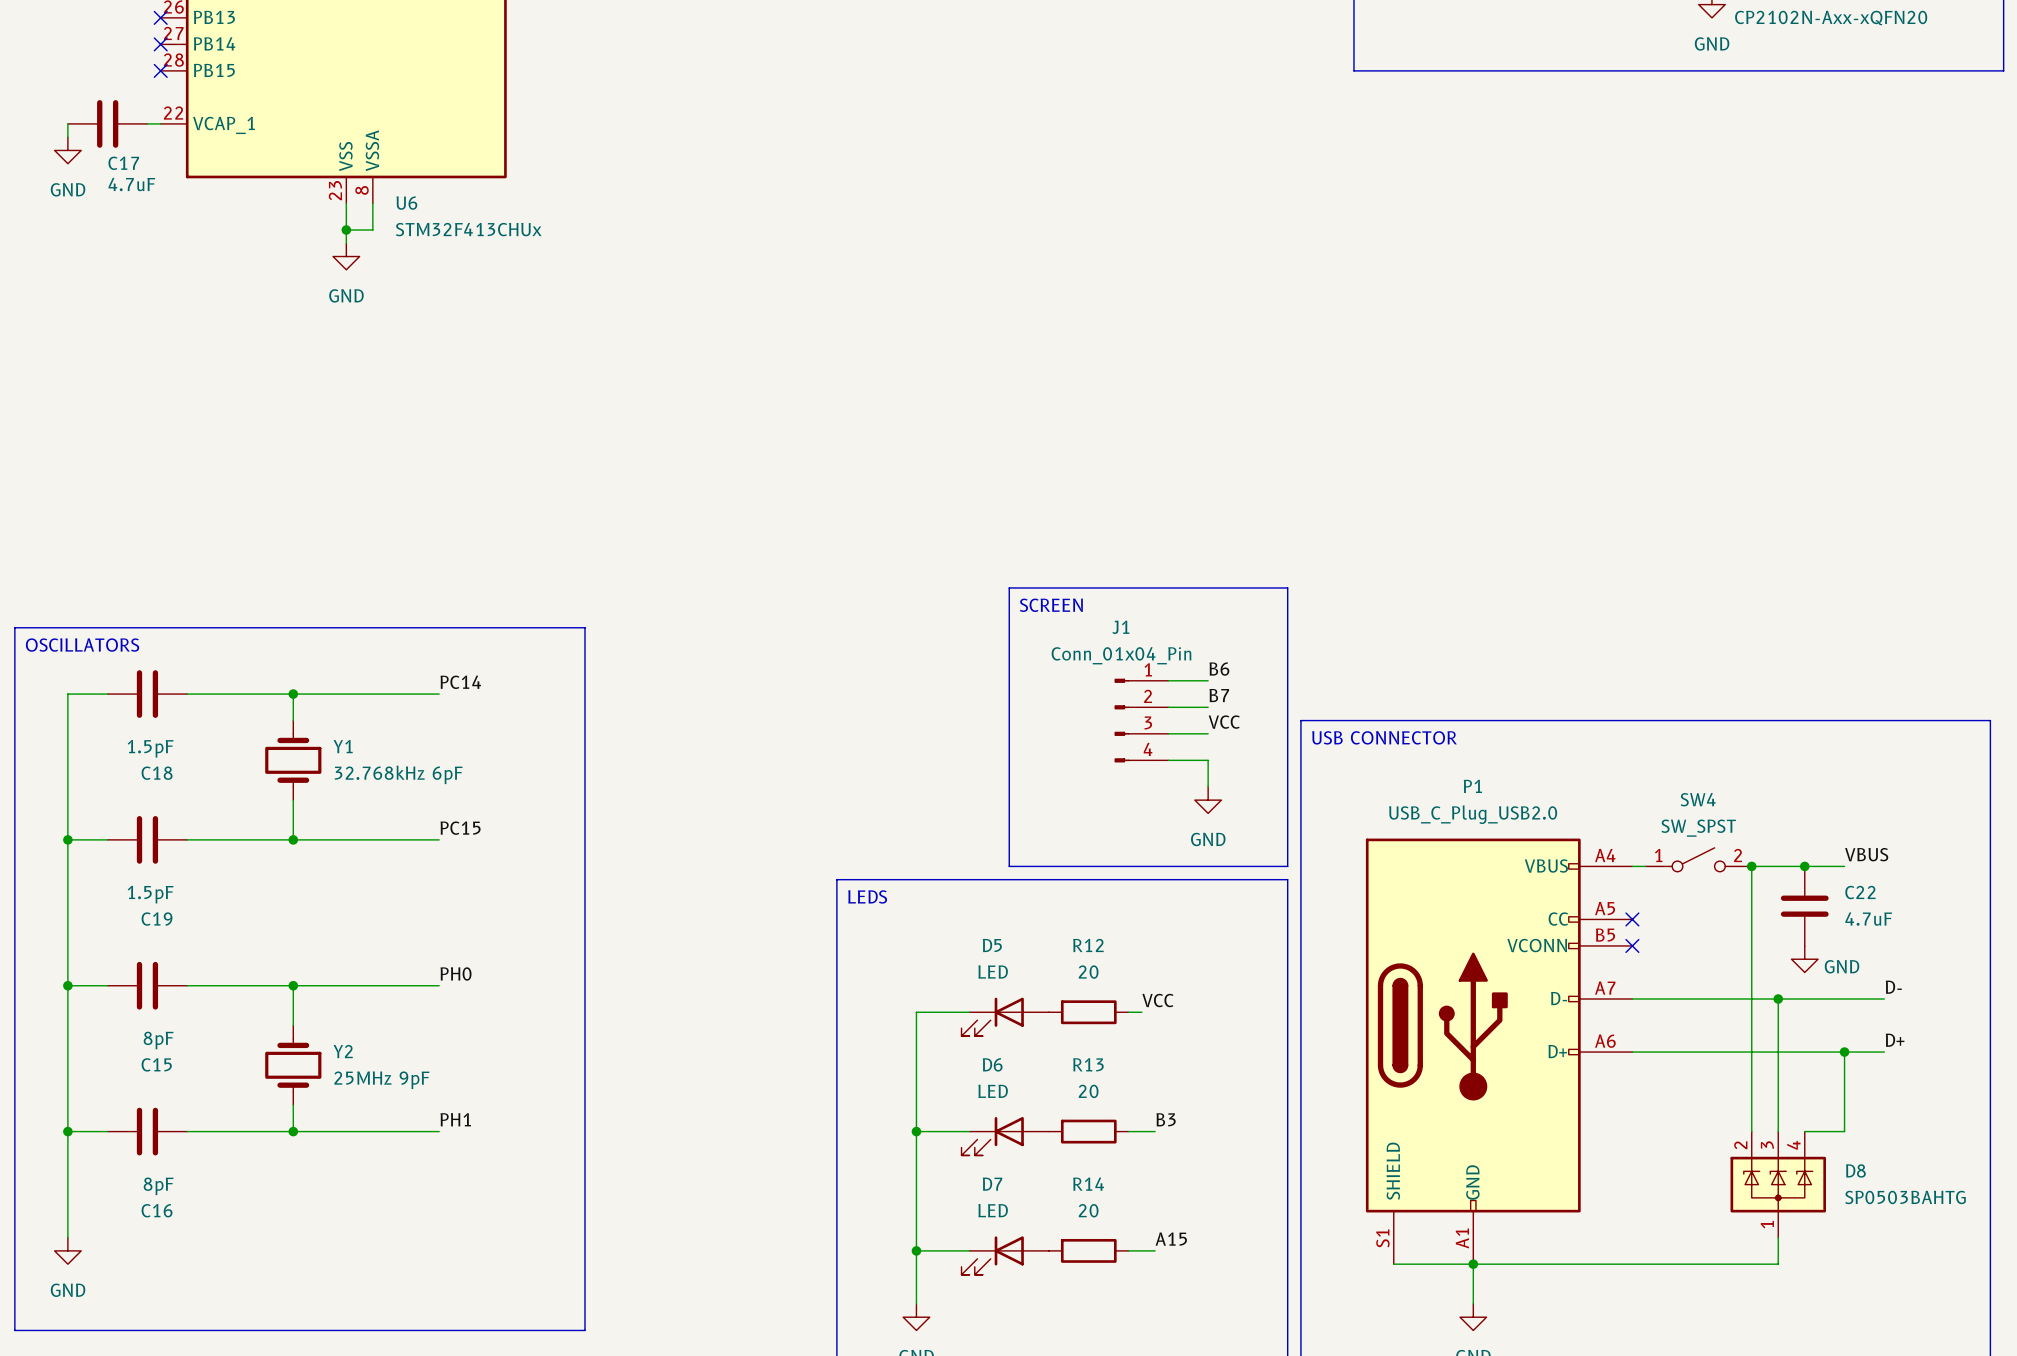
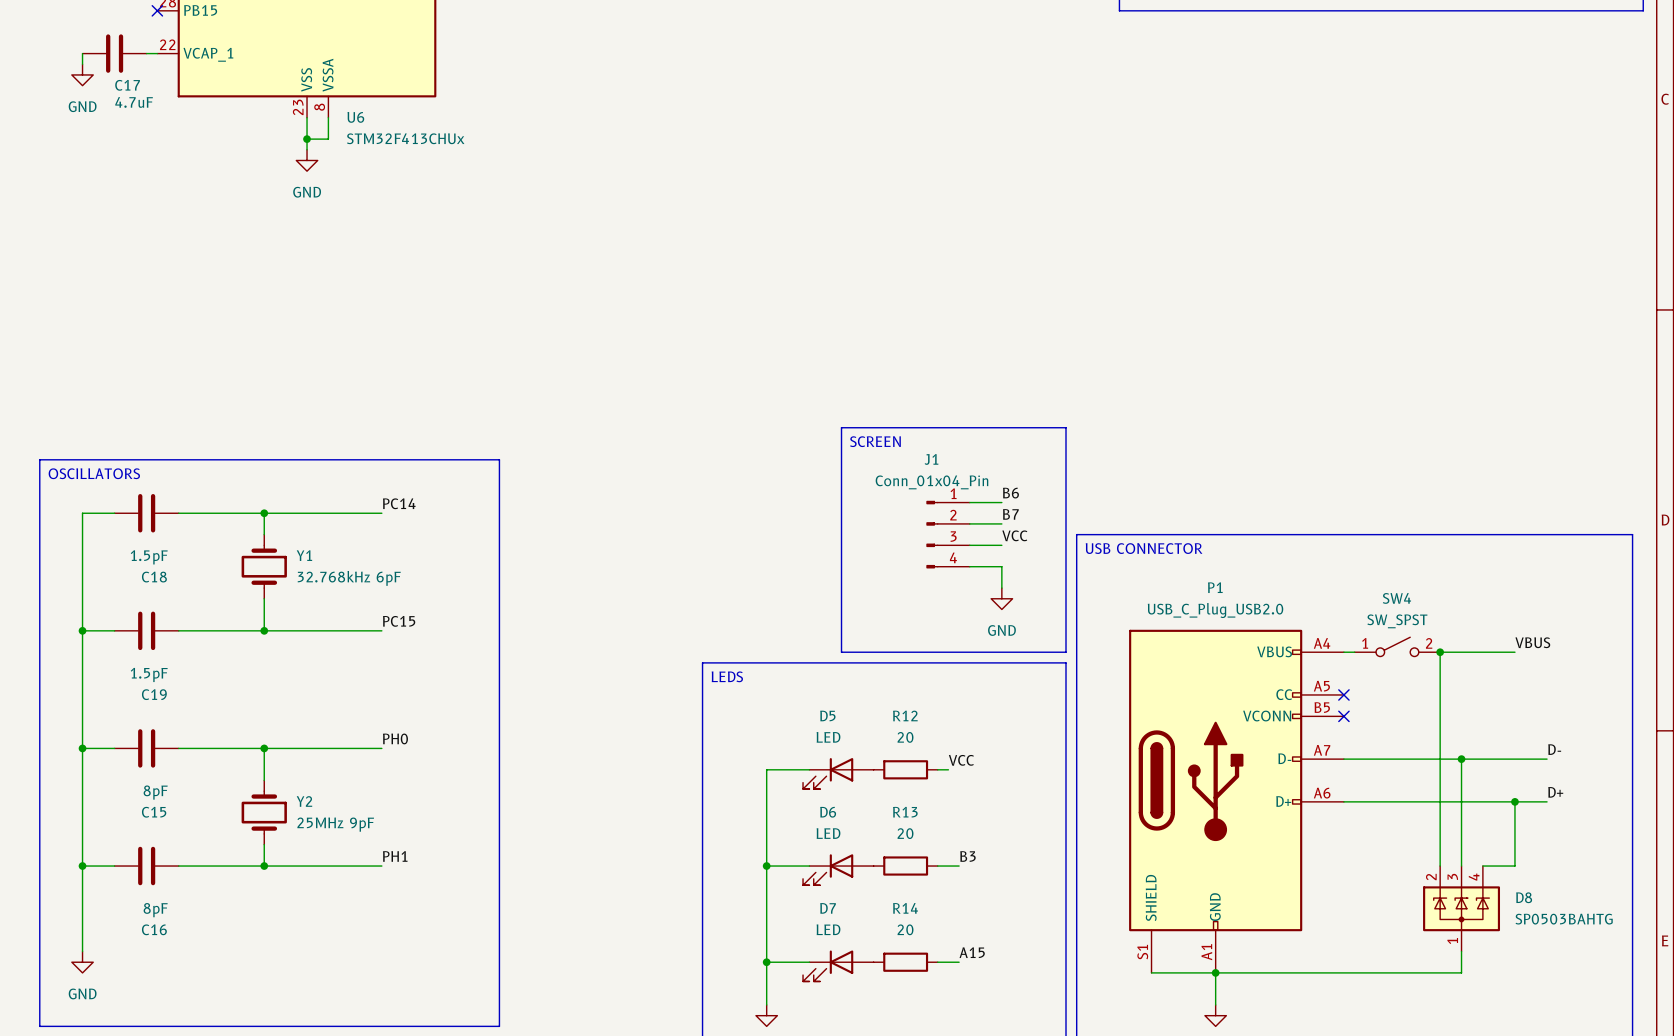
junction: (1804, 866) -> none
C22: 4.7uF (1804, 906) -> none
power symbol: GND (1804, 959) -> none

